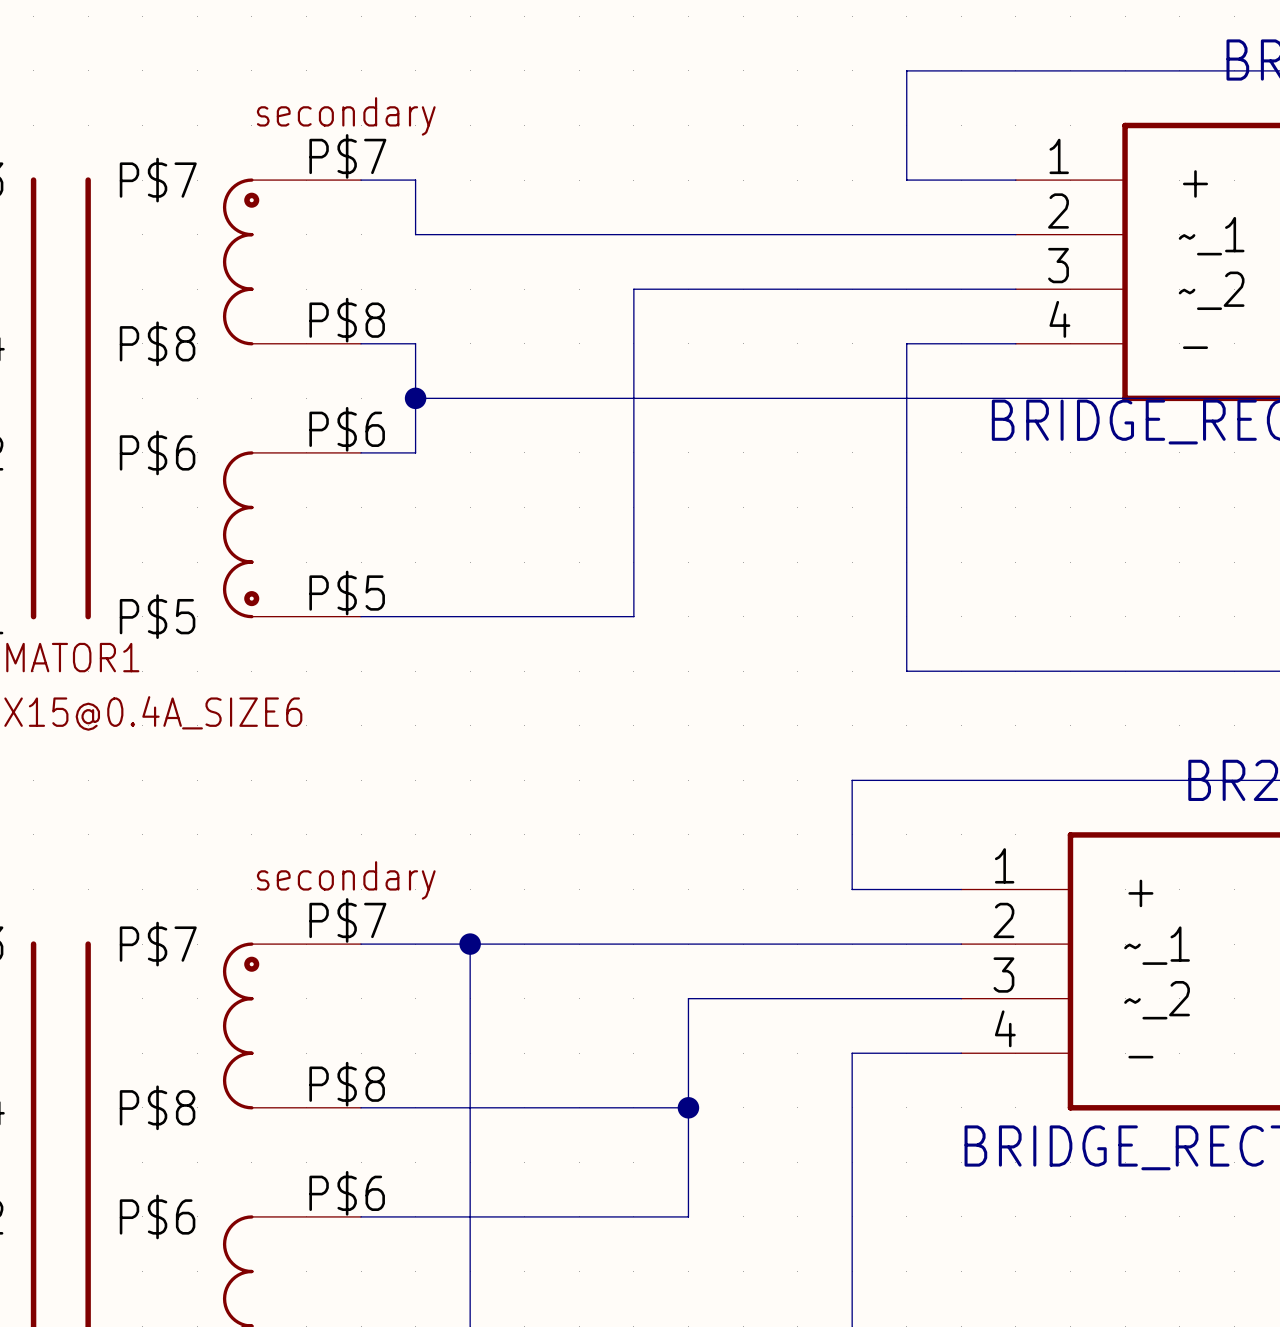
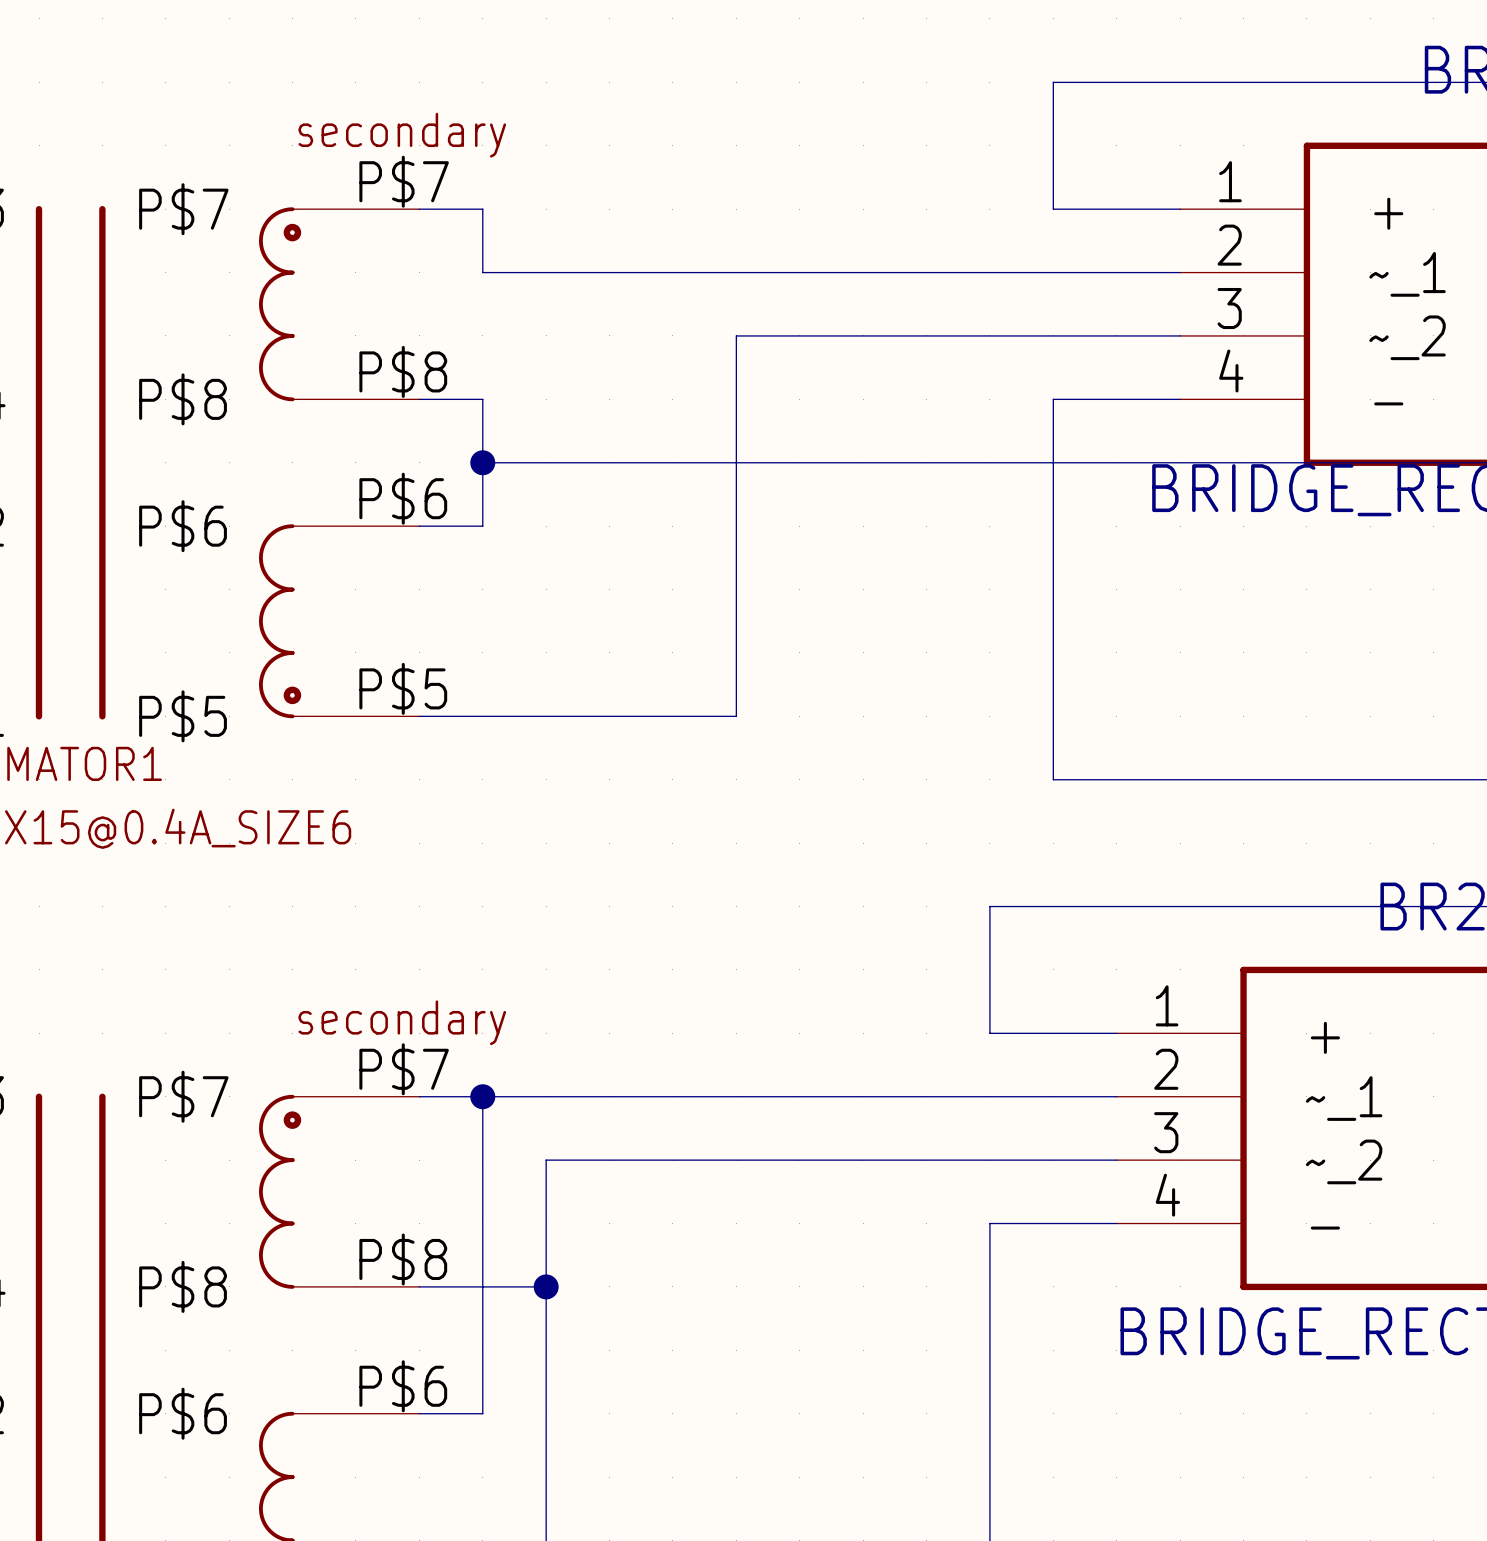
wire: none -> (482, 1096) (482, 1413)
wire: (470, 944) (470, 998) -> none
junction position: (470, 944) -> (482, 1096)
wire: (688, 998) (688, 1216) (415, 1216) -> (799, 1160) (546, 1160)
wire: (470, 1107) (688, 1107) -> none
junction: none -> (546, 1286)
junction: (688, 1107) -> none

